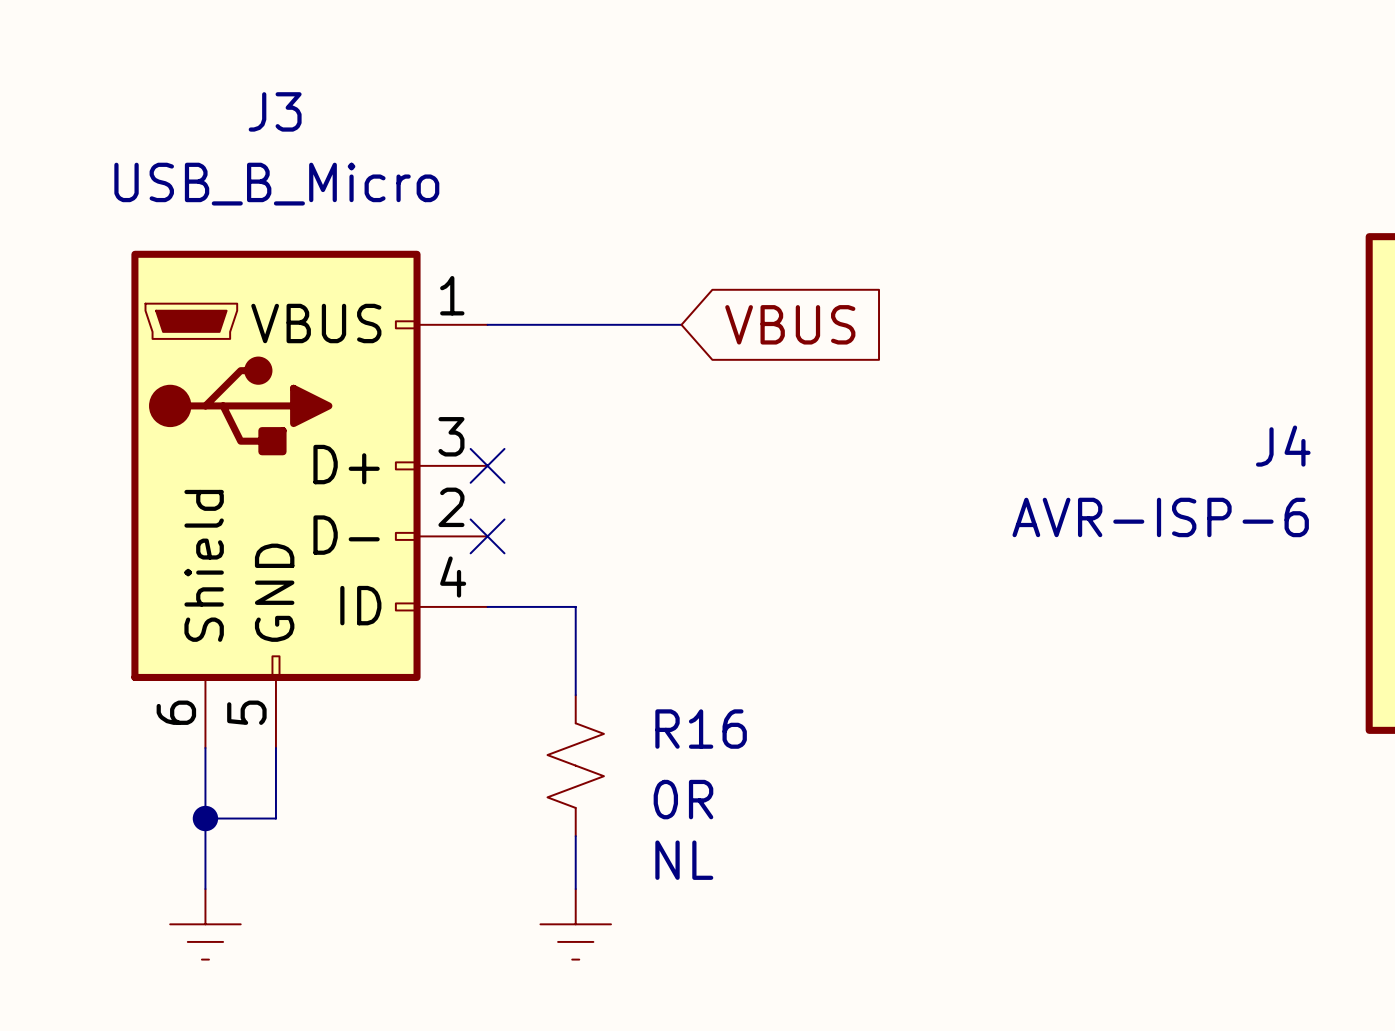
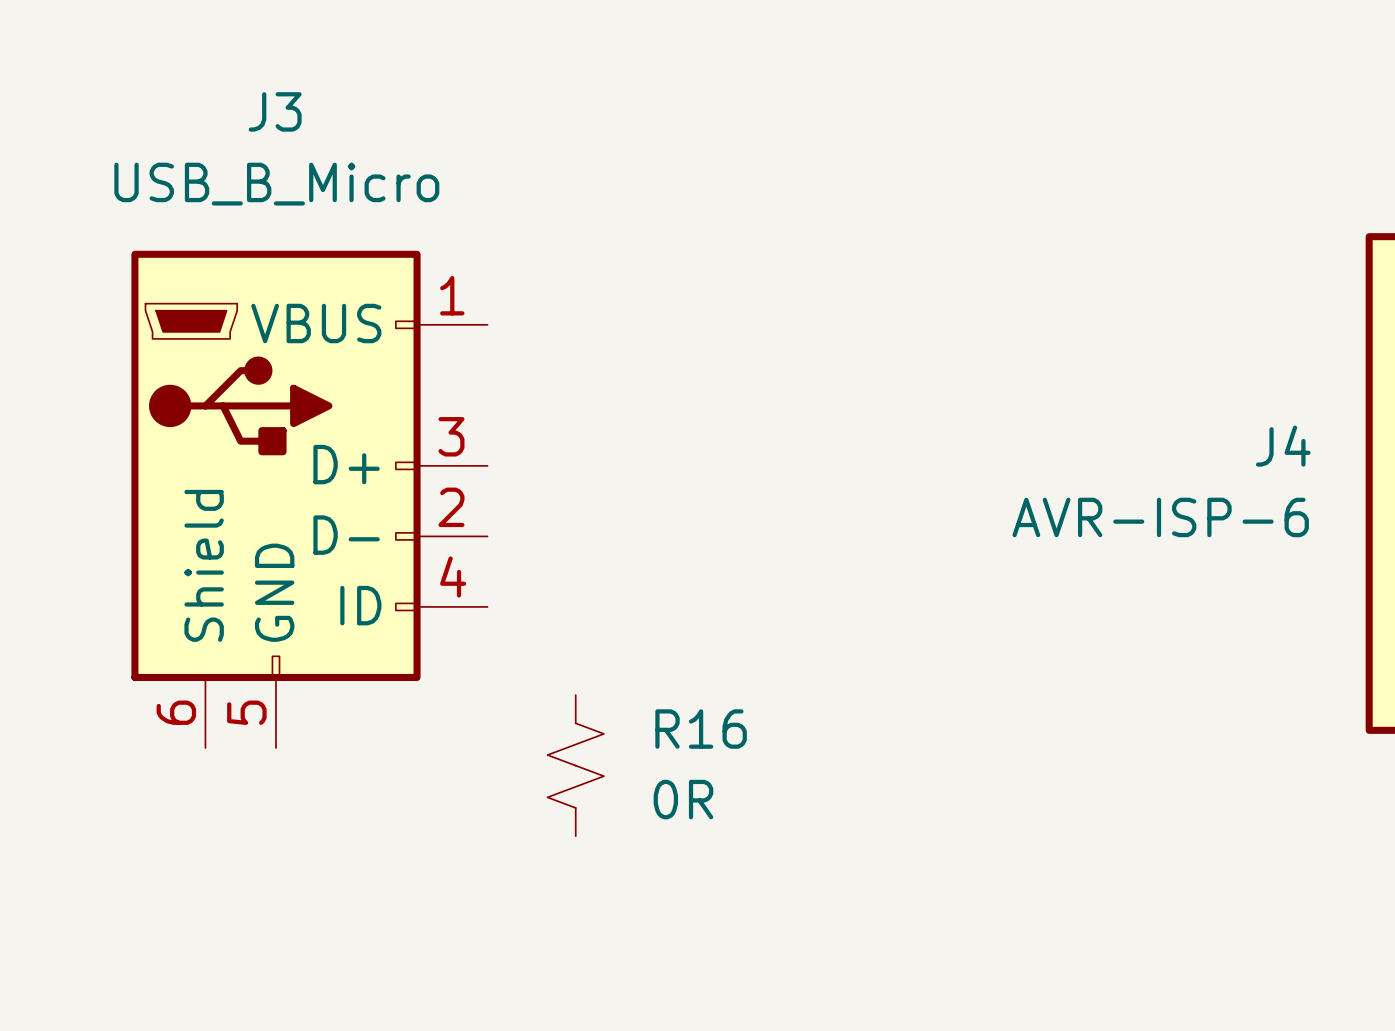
wire: (487, 324) (681, 324) -> none
global label: VBUS (790, 324) -> none
no-connect mark: (487, 465) -> none
no-connect mark: (487, 536) -> none
wire: (487, 606) (575, 606) (575, 695) -> none
wire: (205, 747) (205, 889) -> none
wire: (275, 747) (275, 818) (205, 818) -> none
junction: (205, 818) -> none
wire: (575, 836) (575, 889) -> none
text: NL (684, 860) -> none
power symbol: (205, 924) -> none
power symbol: (575, 924) -> none

